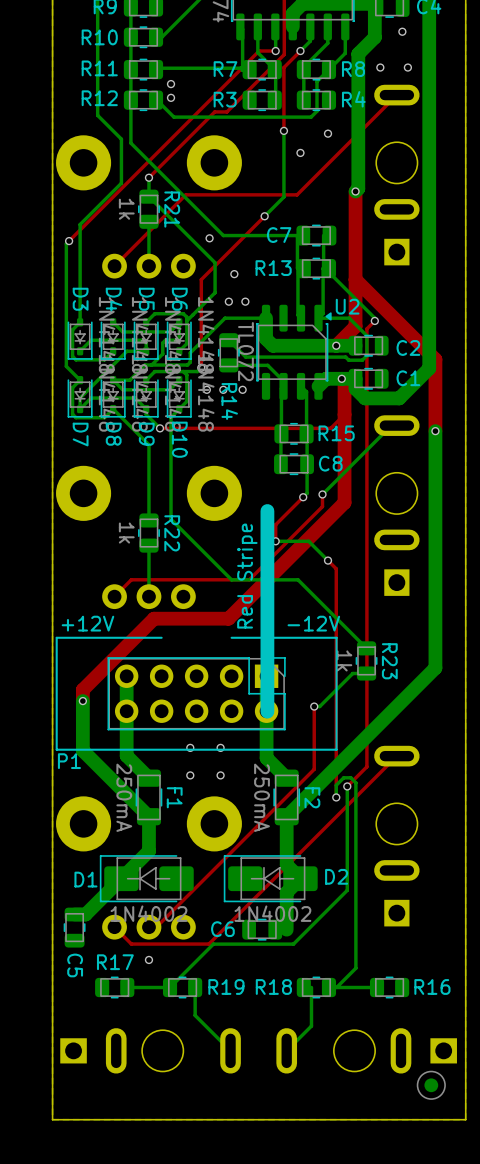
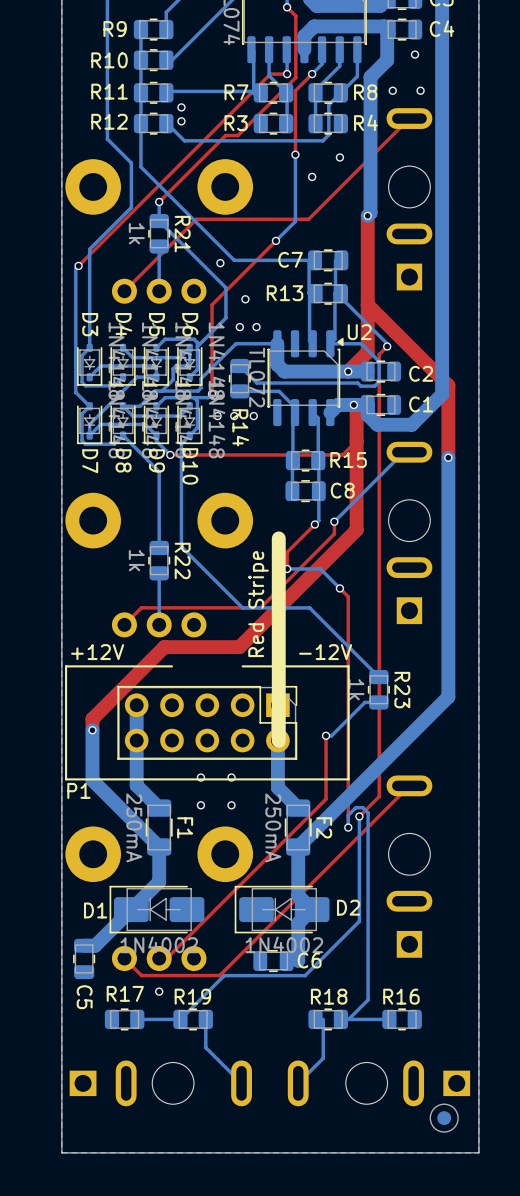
C6 name position: C6 (222, 929) -> C6 (309, 960)
R19 name position: R19 (226, 986) -> R19 (192, 996)
R18 name position: R18 (273, 986) -> R18 (329, 996)
R16 name position: R16 (432, 986) -> R16 (401, 996)

